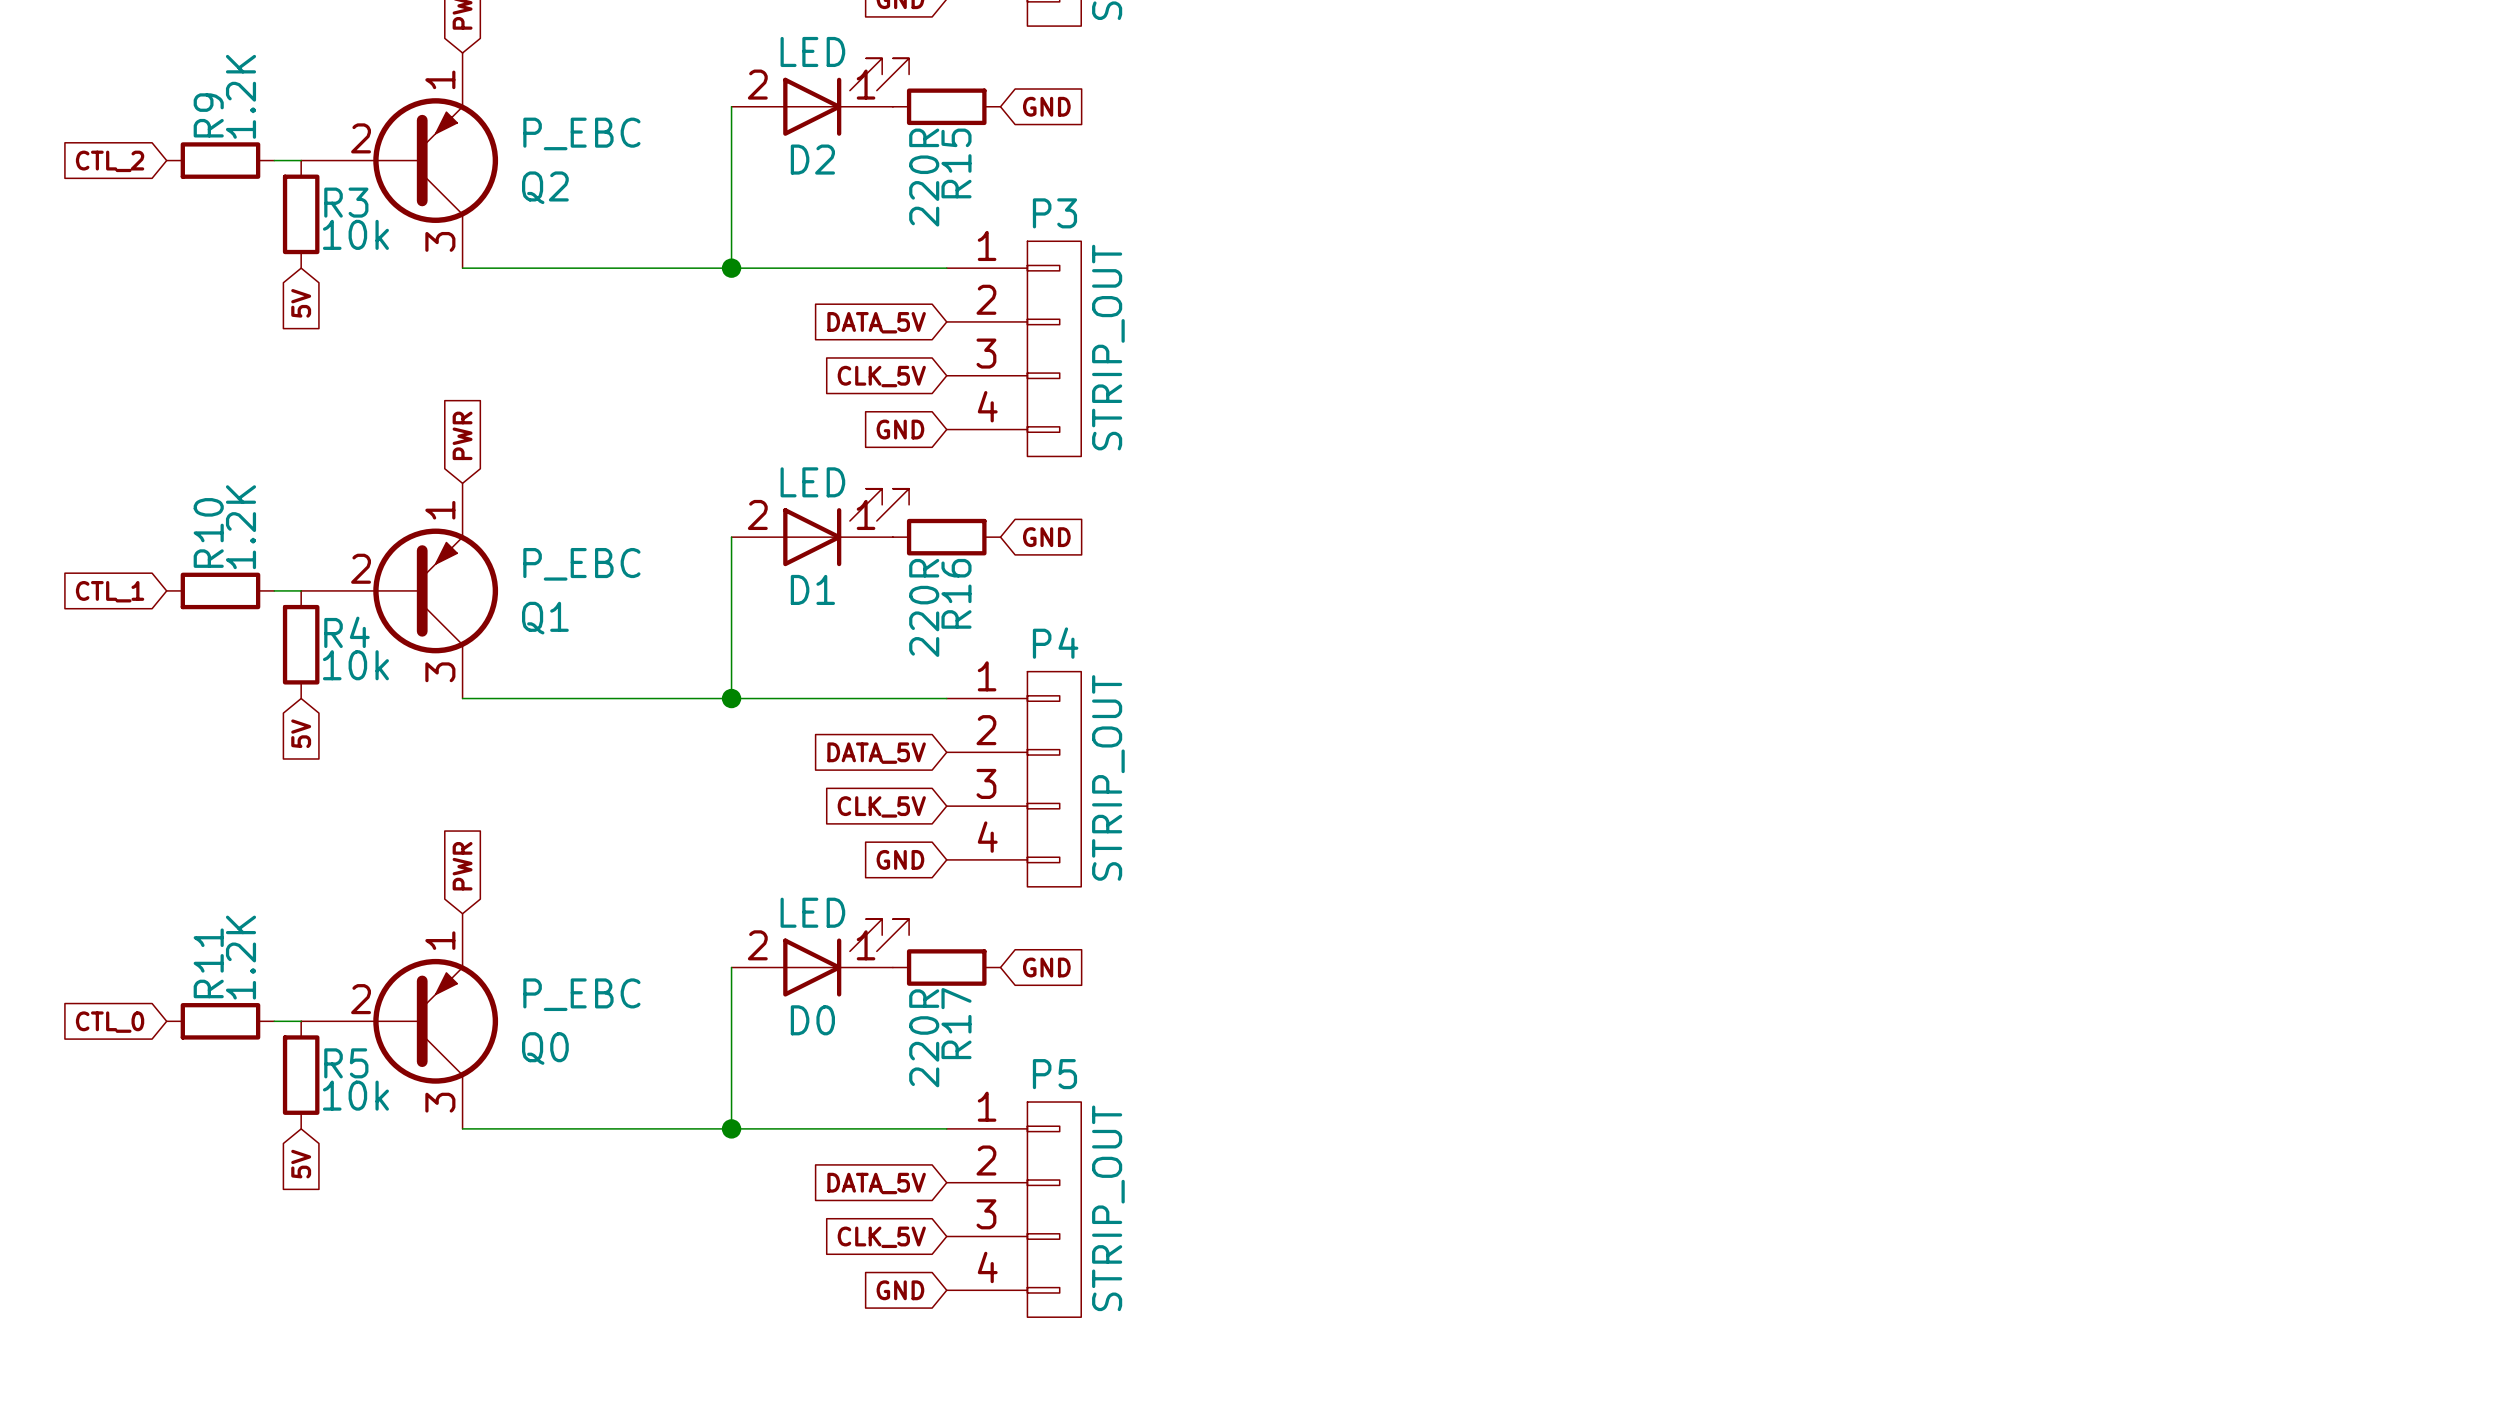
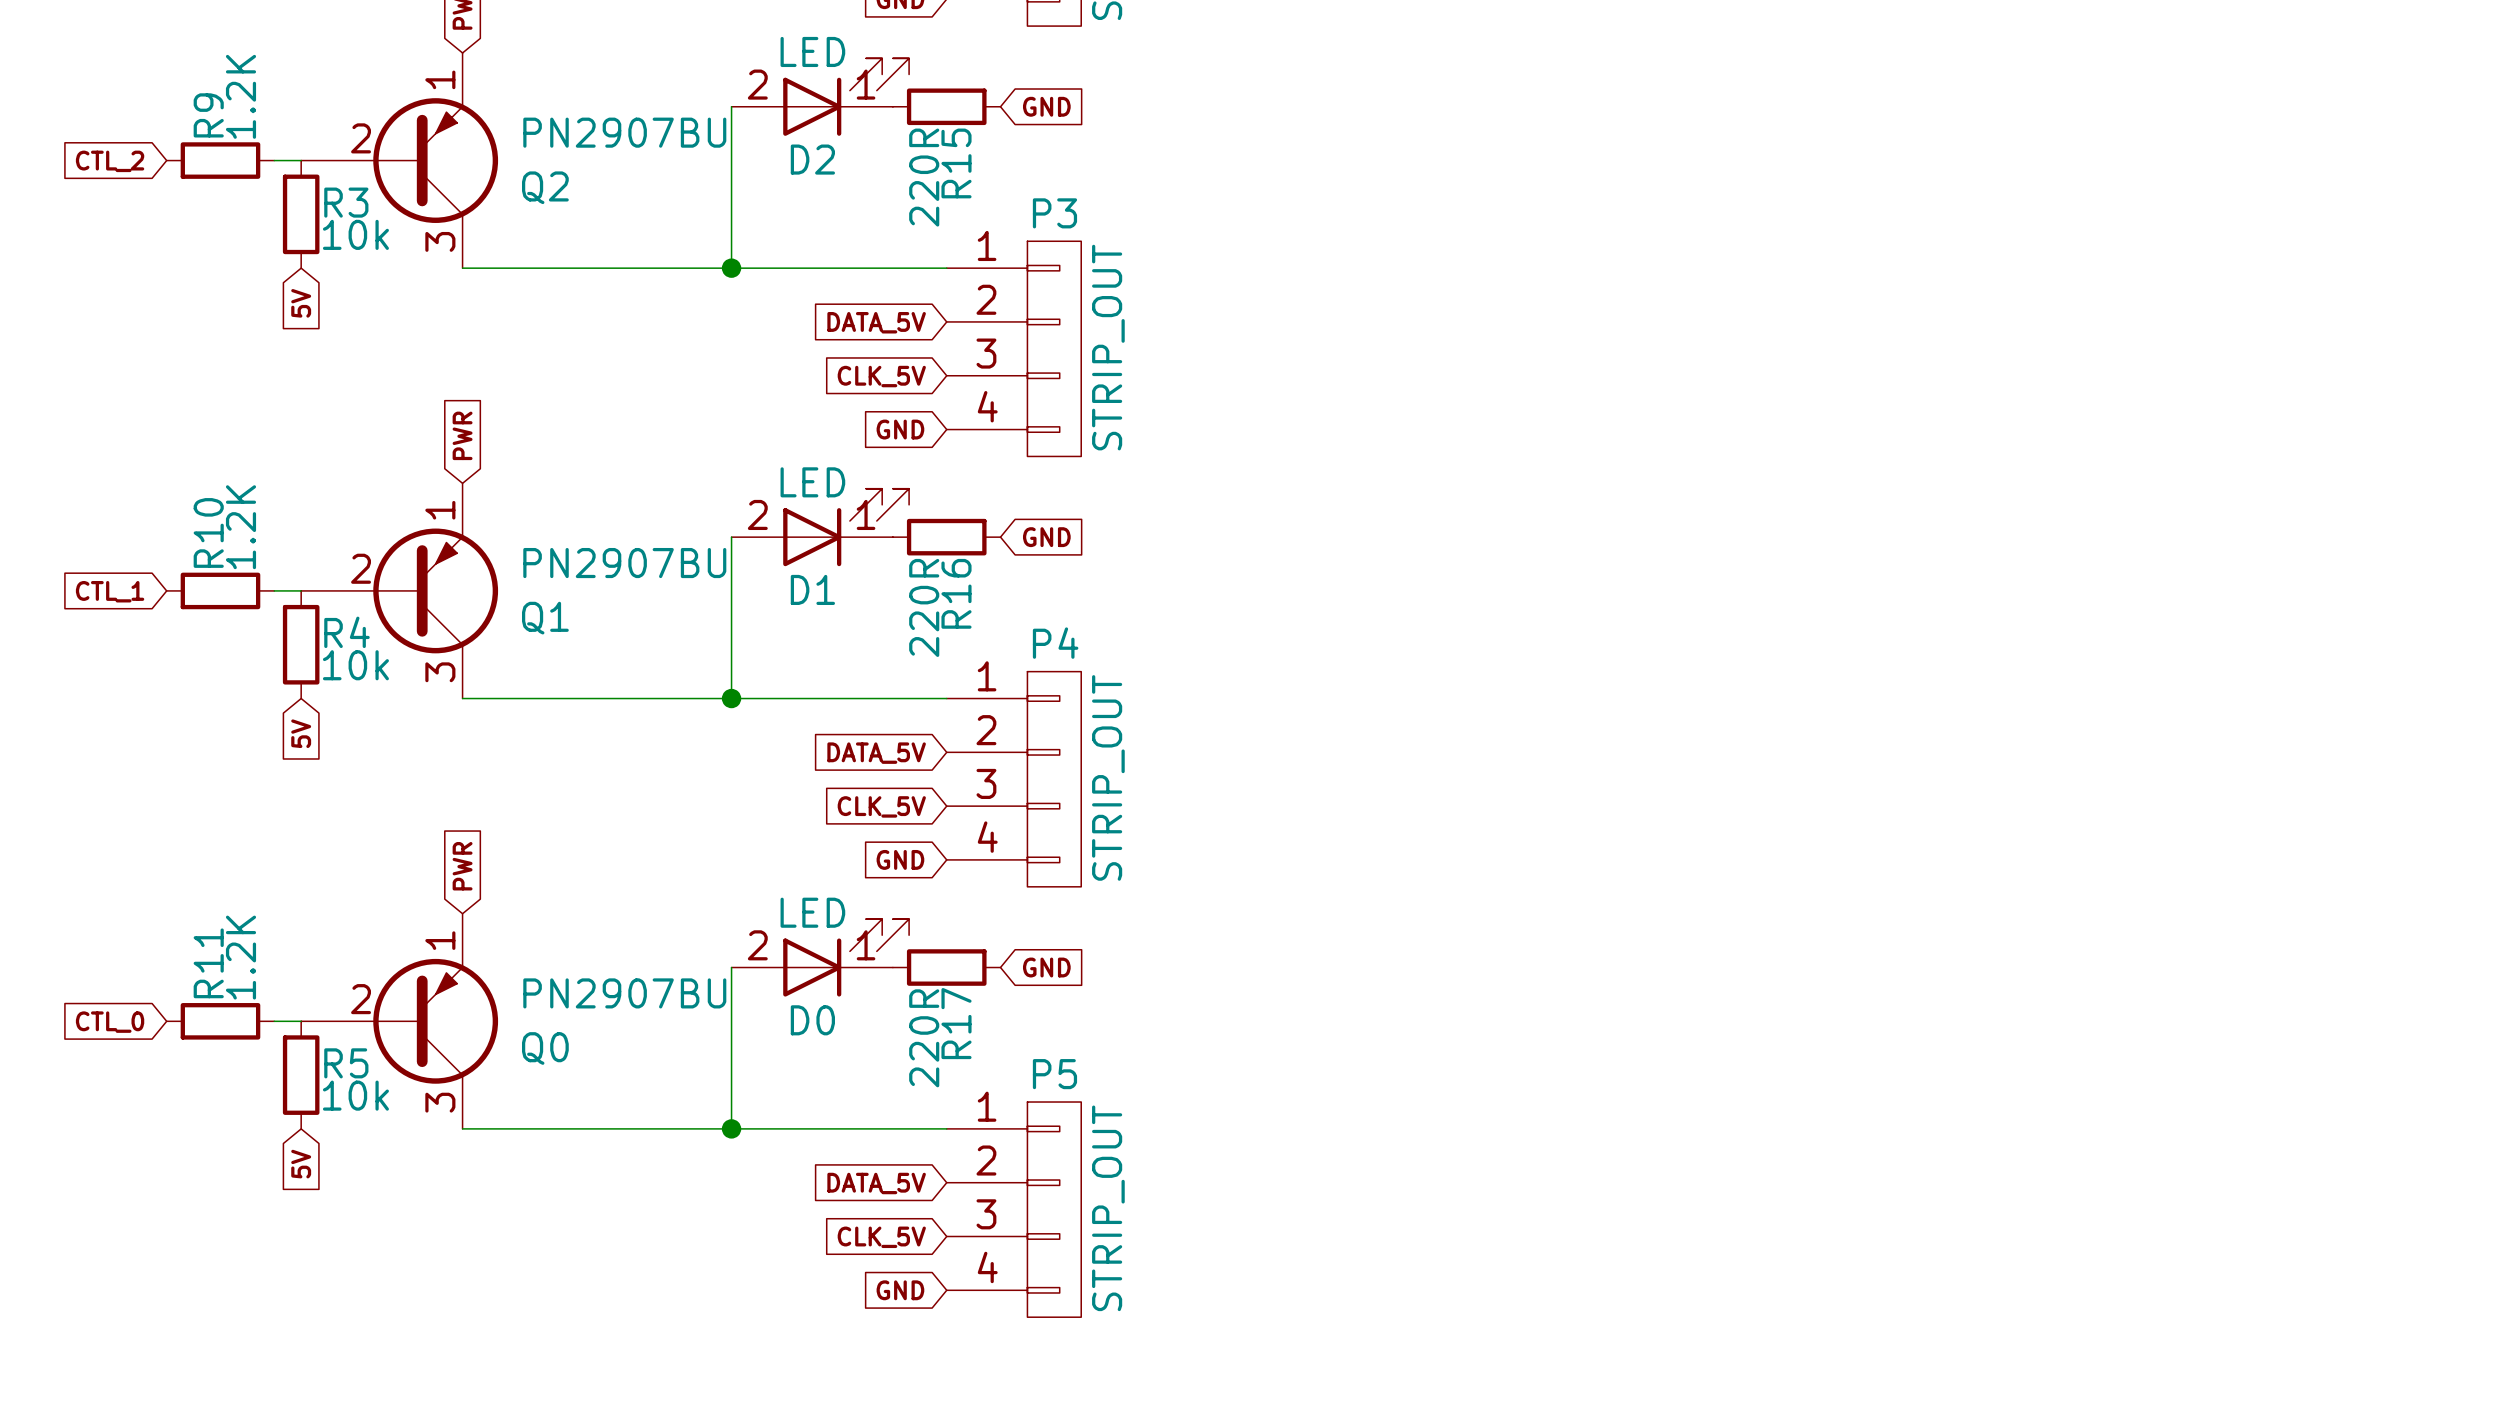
Q2 value: P_EBC (581, 133) -> PN2907BU (624, 132)
Q1 value: P_EBC (581, 564) -> PN2907BU (624, 563)
Q0 value: P_EBC (581, 994) -> PN2907BU (624, 993)

